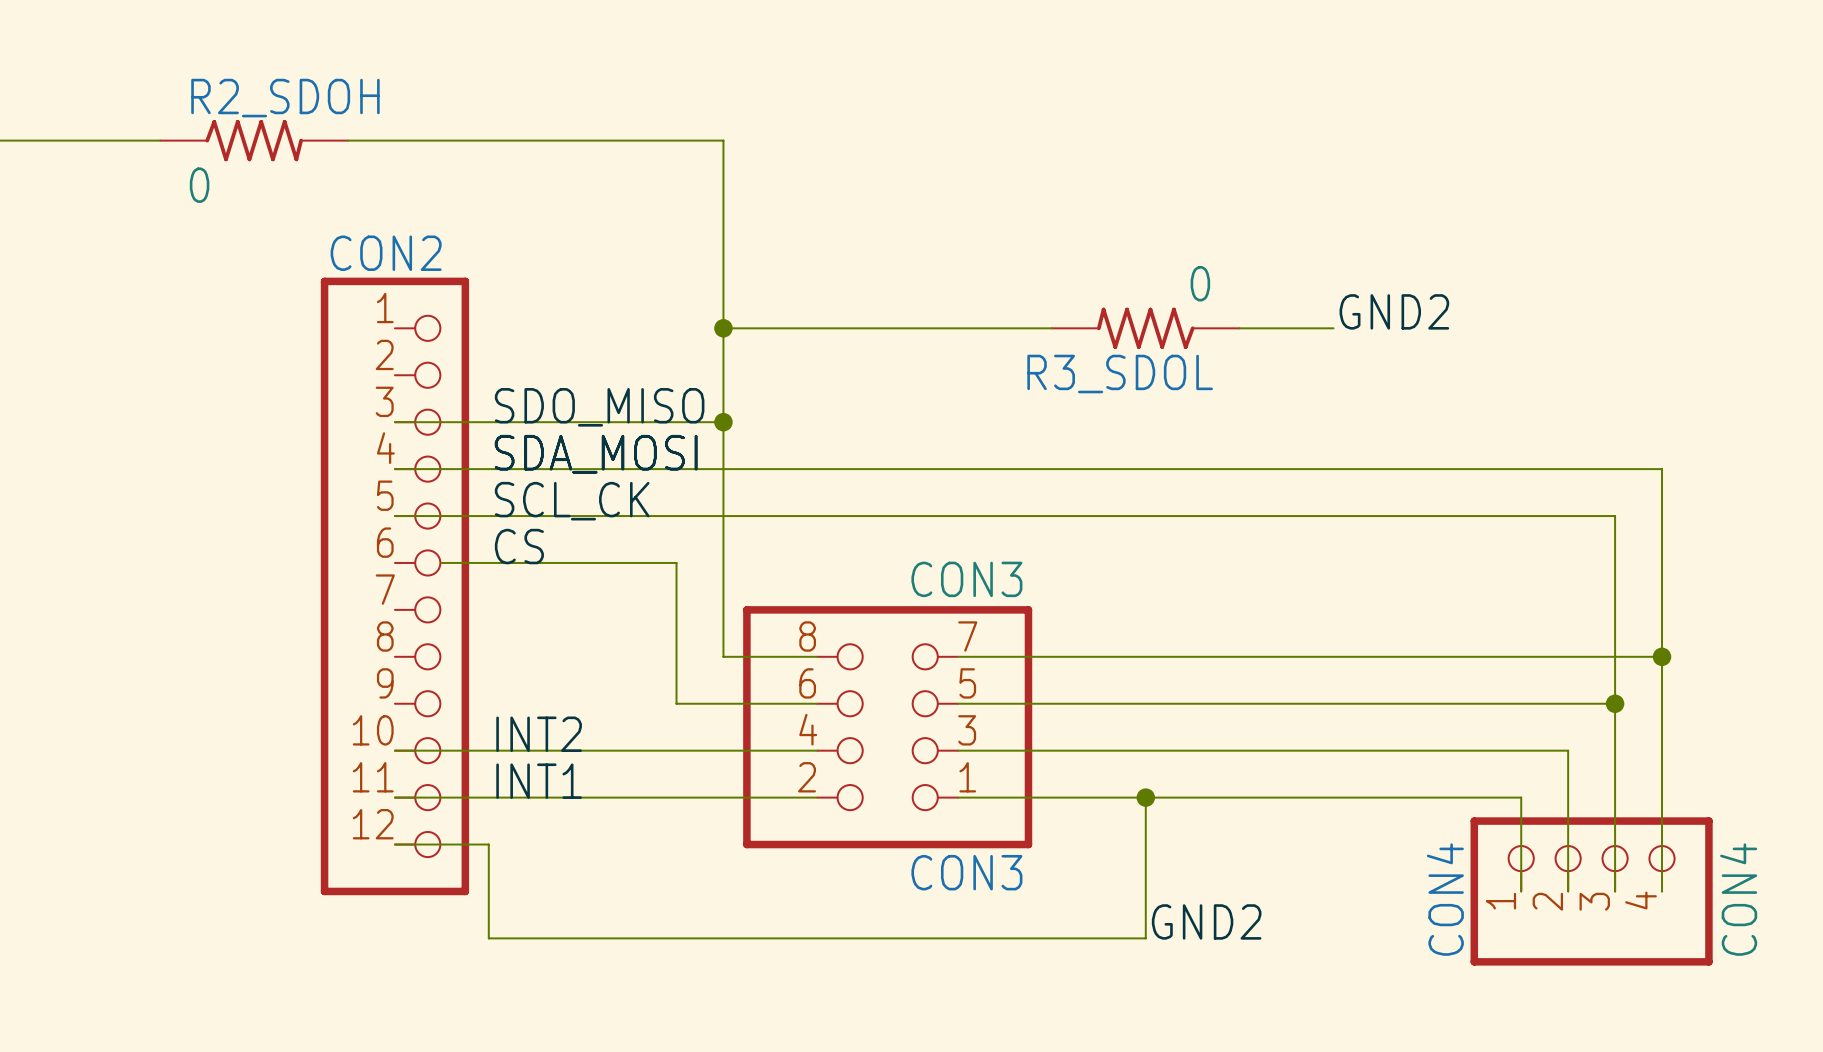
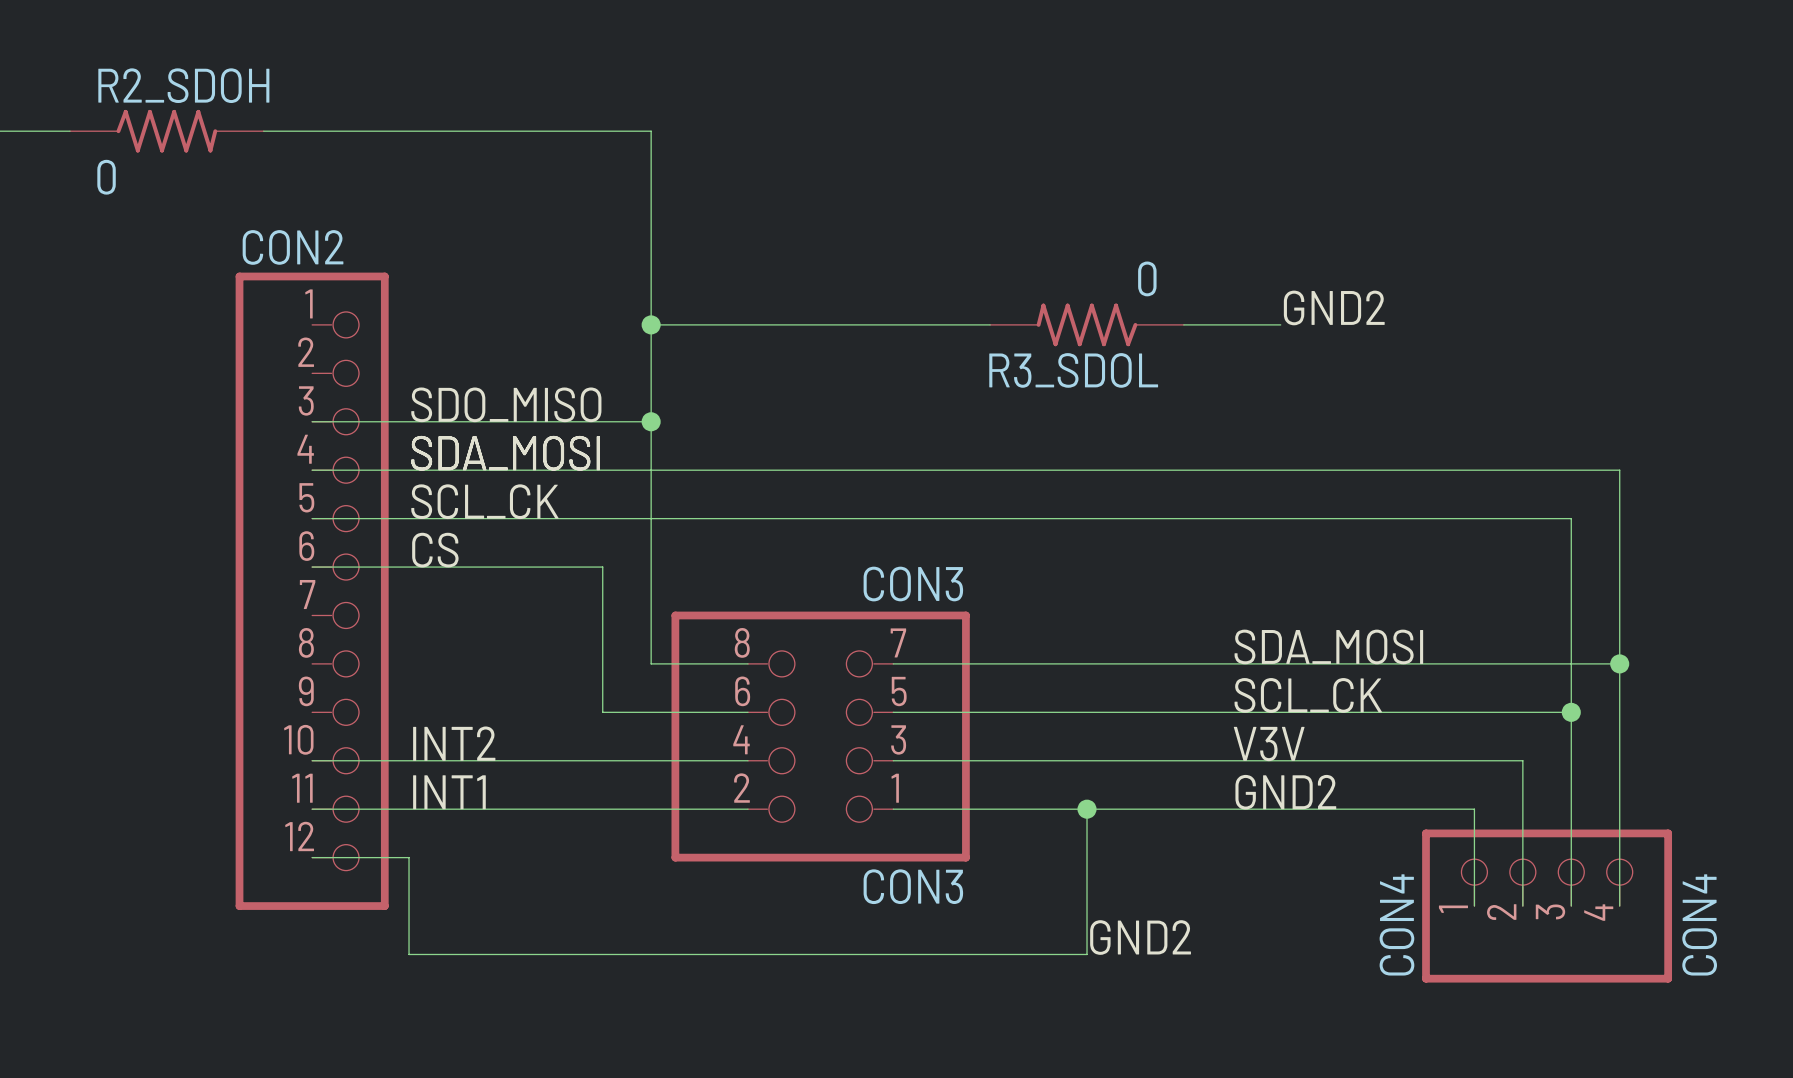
wire: none -> (312, 567) (360, 567)
label: none -> SDA_MOSI (1328, 646)
label: none -> SCL_CK (1308, 695)
label: none -> V3V (1269, 744)
label: none -> GND2 (1285, 792)

